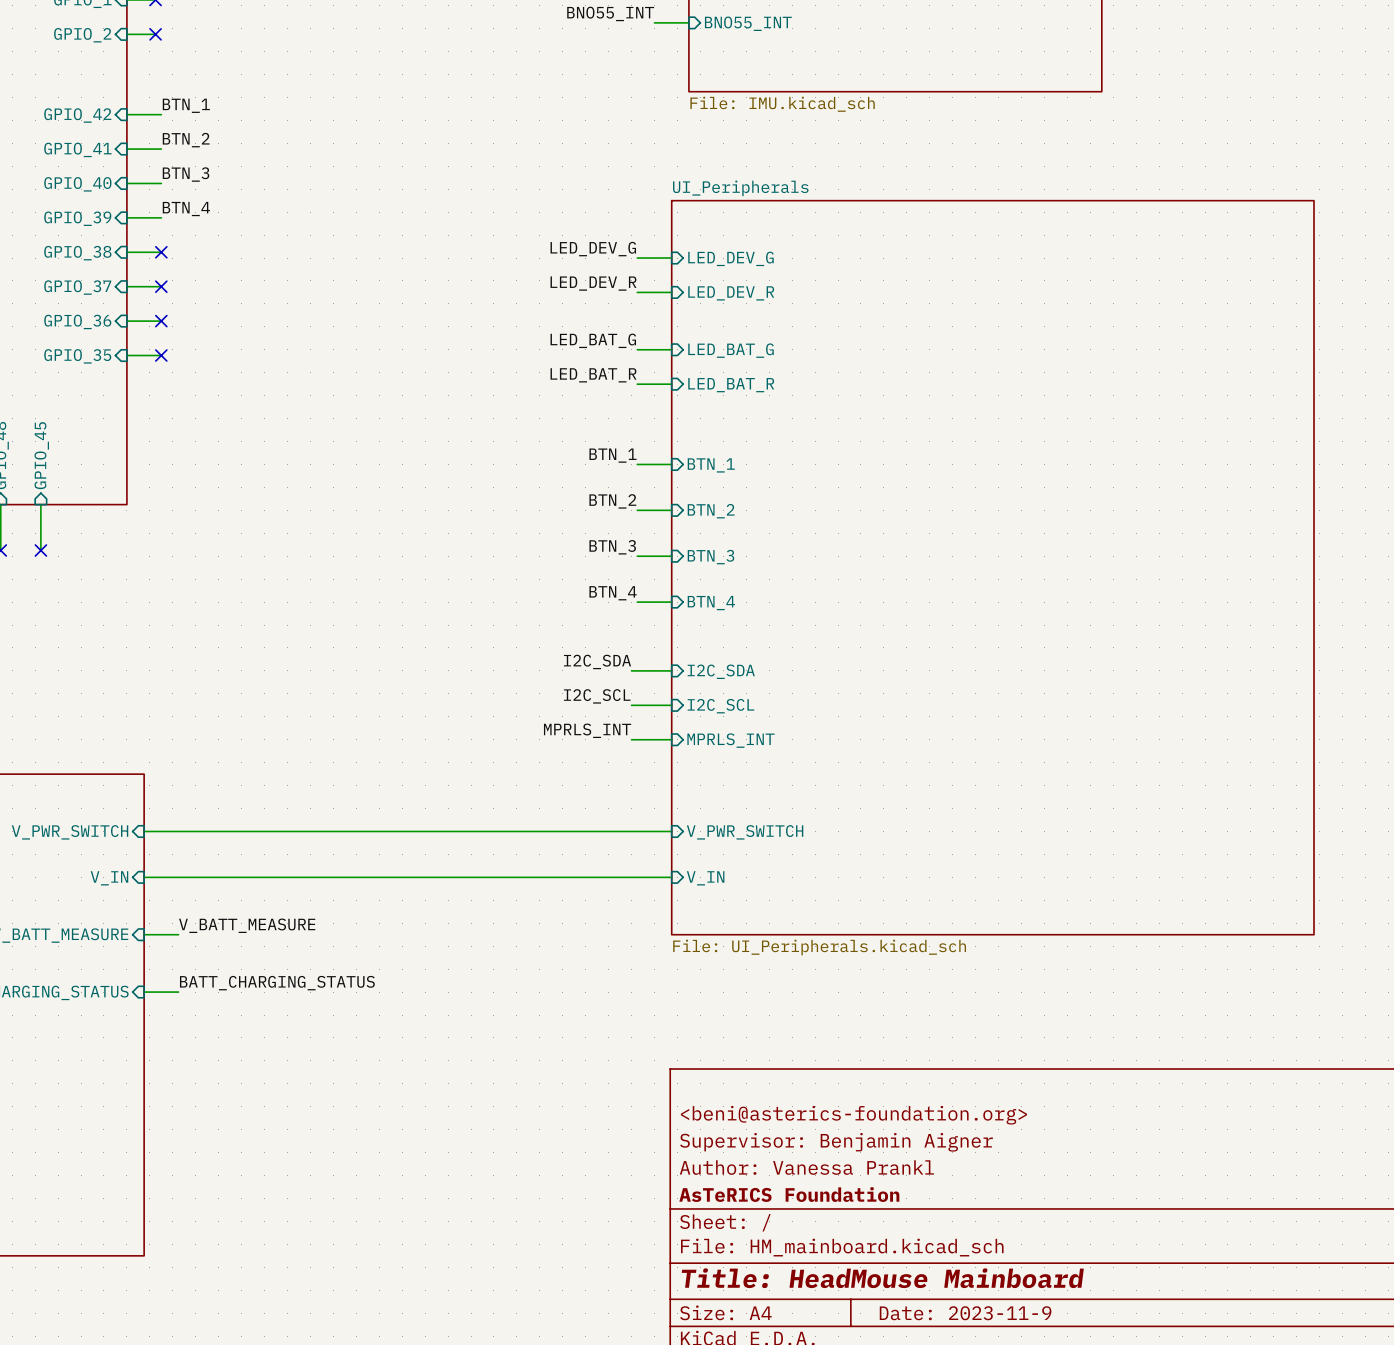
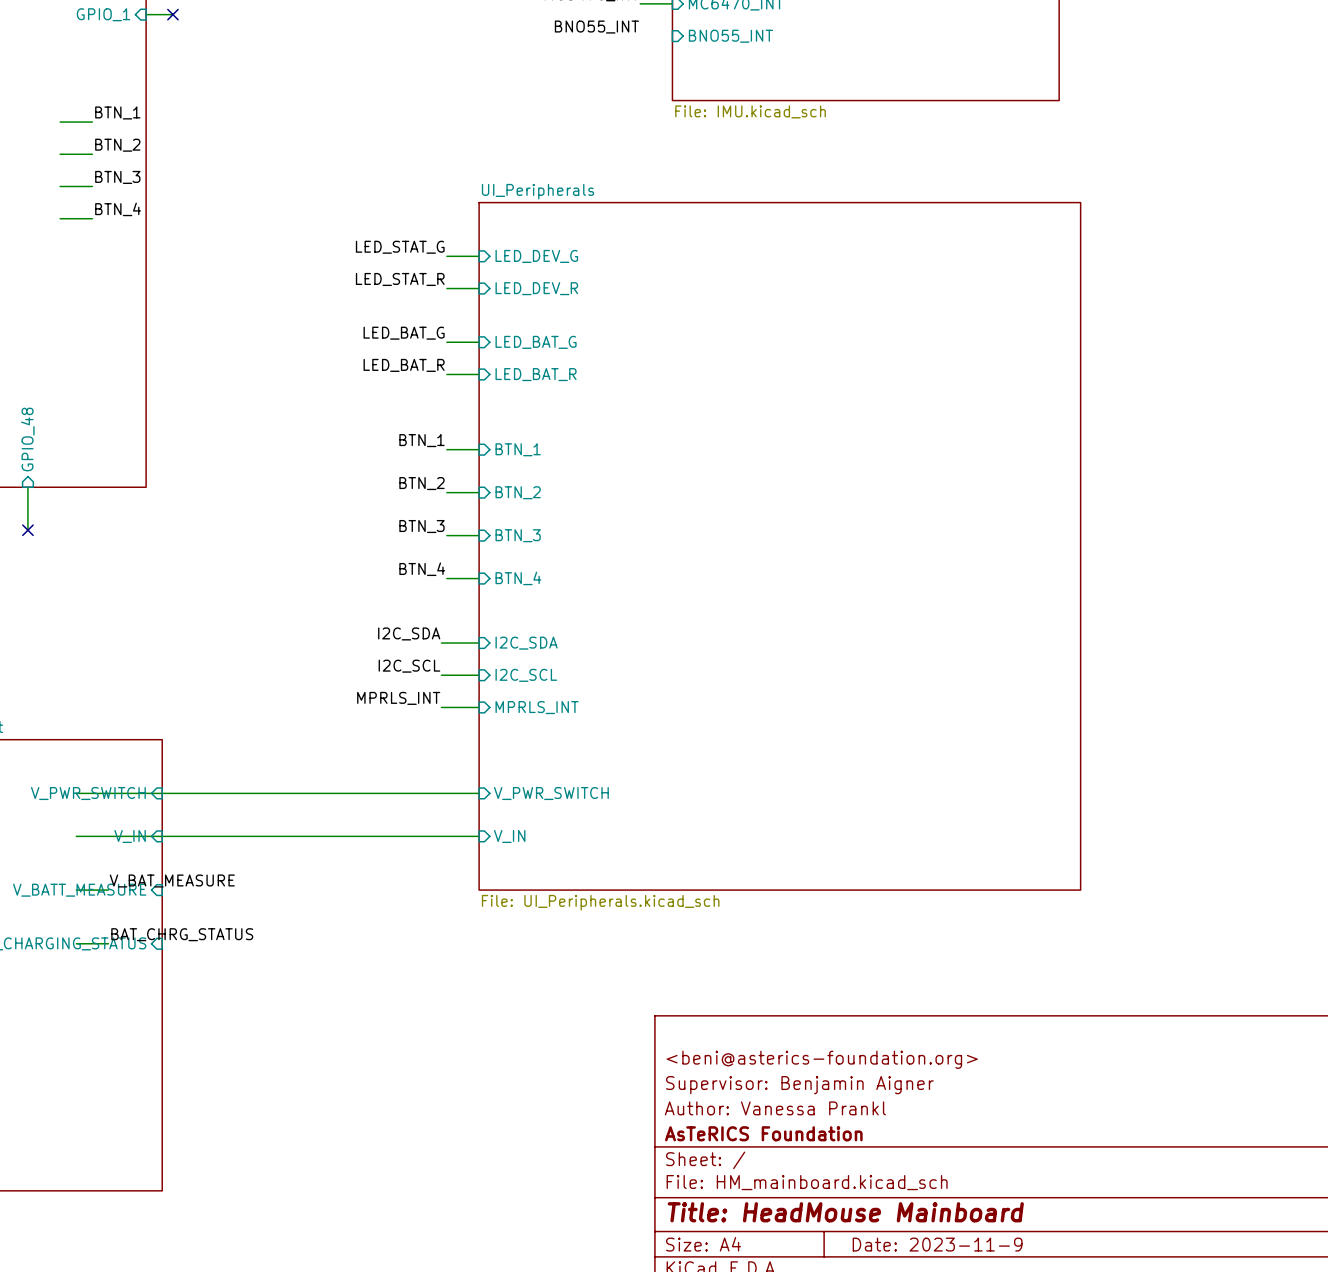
wire: (654, 22) (688, 22) -> none
wire: (126, 34) (155, 34) -> none
no-connect mark: (155, 34) -> none
sheet pin: GPIO_2 (82, 35) -> none
label position: BTN_1 (186, 105) -> BTN_1 (117, 112)
wire: (126, 114) (161, 114) -> (60, 122) (92, 122)
sheet pin: GPIO_42 (77, 115) -> none
label position: BTN_2 (186, 140) -> BTN_2 (117, 145)
sheet pin: GPIO_41 (77, 149) -> none
wire: (126, 149) (161, 149) -> (60, 154) (92, 154)
label position: BTN_3 (186, 174) -> BTN_3 (117, 177)
wire: (126, 183) (161, 183) -> (60, 186) (92, 186)
sheet pin: GPIO_40 (77, 184) -> none
label position: BTN_4 (186, 209) -> BTN_4 (118, 209)
wire: (126, 217) (161, 217) -> (60, 218) (92, 218)
sheet pin: GPIO_39 (77, 218) -> none
label: none -> LED_STAT_G (400, 247)
label: LED_DEV_G (593, 249) -> none
wire: (126, 252) (161, 252) -> none
no-connect mark: (161, 252) -> none
sheet pin: GPIO_38 (77, 253) -> none
wire: (637, 258) (671, 258) -> (446, 256) (479, 256)
sheet pin position: LED_DEV_G (730, 258) -> LED_DEV_G (536, 256)
label: none -> LED_STAT_R (400, 279)
label: LED_DEV_R (593, 283) -> none
wire: (126, 286) (161, 286) -> none
no-connect mark: (161, 286) -> none
sheet pin: GPIO_37 (77, 287) -> none
wire: (637, 292) (671, 292) -> (446, 288) (479, 288)
sheet pin position: LED_DEV_R (731, 293) -> LED_DEV_R (536, 288)
sheet pin: GPIO_36 (77, 321) -> none
wire: (126, 321) (161, 321) -> none
no-connect mark: (161, 321) -> none
label position: LED_BAT_G (593, 340) -> LED_BAT_G (404, 333)
wire: (637, 349) (671, 349) -> (446, 342) (479, 342)
sheet pin position: LED_BAT_G (730, 350) -> LED_BAT_G (536, 342)
wire: (126, 355) (161, 355) -> none
no-connect mark: (161, 355) -> none
sheet pin: GPIO_35 (77, 356) -> none
label position: LED_BAT_R (593, 375) -> LED_BAT_R (404, 365)
wire: (637, 384) (671, 384) -> (446, 374) (479, 374)
sheet pin position: LED_BAT_R (731, 385) -> LED_BAT_R (536, 374)
sheet pin: GPIO_45 (41, 455) -> none
label position: BTN_1 (612, 455) -> BTN_1 (421, 440)
wire: (637, 464) (671, 464) -> (446, 449) (479, 449)
sheet pin position: BTN_1 (711, 465) -> BTN_1 (518, 449)
label position: BTN_2 (612, 501) -> BTN_2 (421, 483)
wire: (40, 504) (40, 550) -> none
wire: (637, 510) (671, 510) -> (446, 492) (479, 492)
sheet pin position: BTN_2 (711, 511) -> BTN_2 (518, 492)
label position: BTN_3 (612, 547) -> BTN_3 (421, 526)
no-connect mark: (40, 550) -> none
wire: (637, 556) (671, 556) -> (446, 535) (479, 535)
sheet pin position: BTN_3 (710, 557) -> BTN_3 (518, 535)
sheet UI_Peripherals position: (992, 567) -> (779, 546)
label position: BTN_4 (613, 593) -> BTN_4 (422, 569)
wire: (637, 602) (671, 602) -> (446, 578) (479, 578)
sheet pin position: BTN_4 (711, 603) -> BTN_4 (518, 578)
label position: I2C_SDA (597, 661) -> I2C_SDA (409, 633)
wire: (631, 670) (671, 670) -> (441, 643) (479, 643)
sheet pin position: I2C_SDA (721, 671) -> I2C_SDA (526, 643)
label position: I2C_SCL (597, 696) -> I2C_SCL (409, 666)
wire: (631, 705) (671, 705) -> (441, 675) (479, 675)
sheet pin position: I2C_SCL (720, 706) -> I2C_SCL (526, 675)
label position: MPRLS_INT (587, 730) -> MPRLS_INT (398, 698)
wire: (631, 739) (671, 739) -> (441, 707) (479, 707)
sheet pin position: MPRLS_INT (731, 740) -> MPRLS_INT (537, 707)
wire: none -> (76, 793) (162, 793)
wire: (482, 831) (671, 831) -> none
sheet pin position: V_PWR_SWITCH (745, 832) -> V_PWR_SWITCH (551, 793)
wire: none -> (76, 836) (162, 836)
wire: (482, 877) (671, 877) -> none
sheet pin position: V_IN (705, 878) -> V_IN (509, 836)
label: V_BATT_MEASURE (247, 925) -> V_BAT_MEASURE (172, 880)
wire: (144, 934) (178, 934) -> (76, 890) (108, 890)
label: BATT_CHARGING_STATUS (277, 983) -> BAT_CHRG_STATUS (182, 934)
wire: (144, 992) (178, 992) -> (76, 943) (108, 943)

